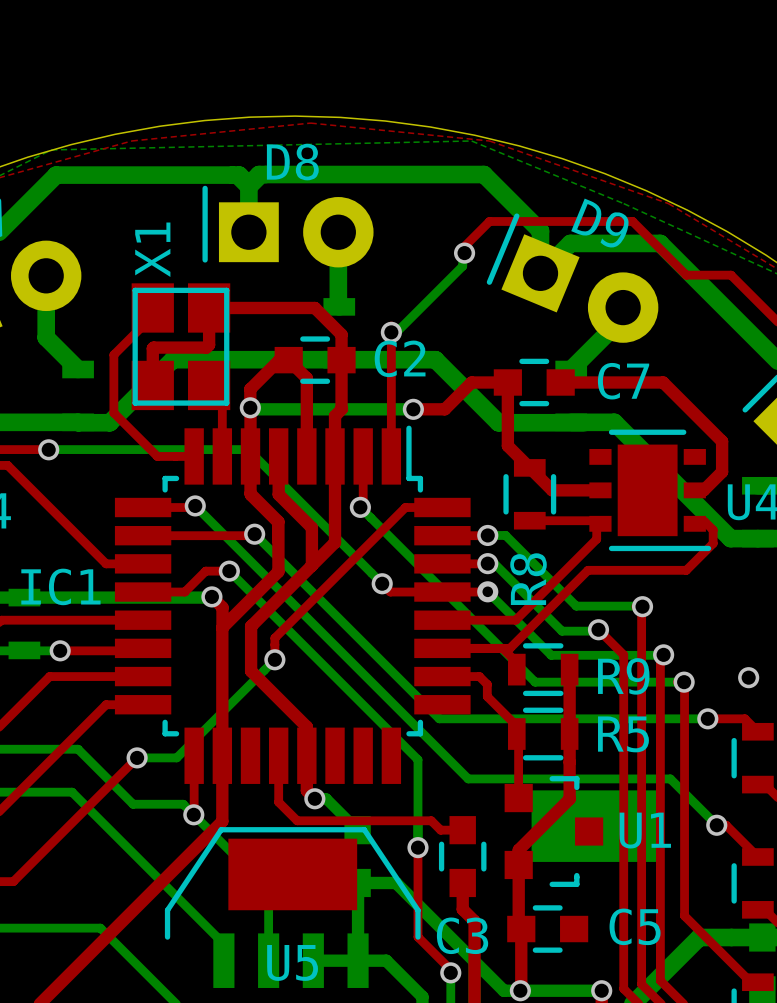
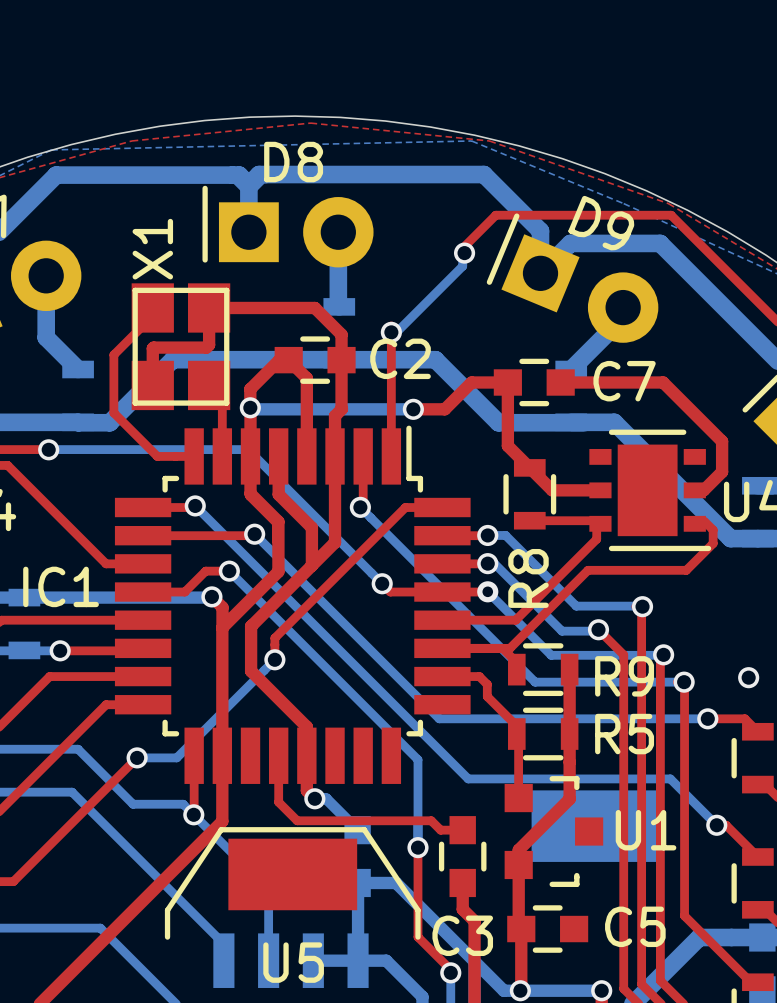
top track: (489, 221) (632, 221) (686, 275) (731, 275) -> (489, 221) (495, 215) (671, 215) (731, 275)

